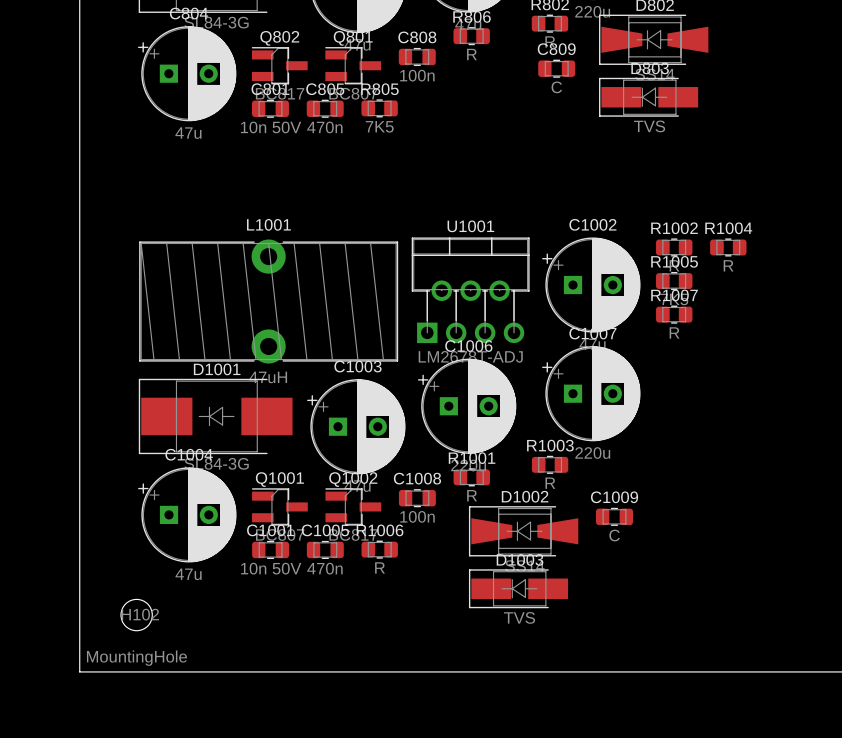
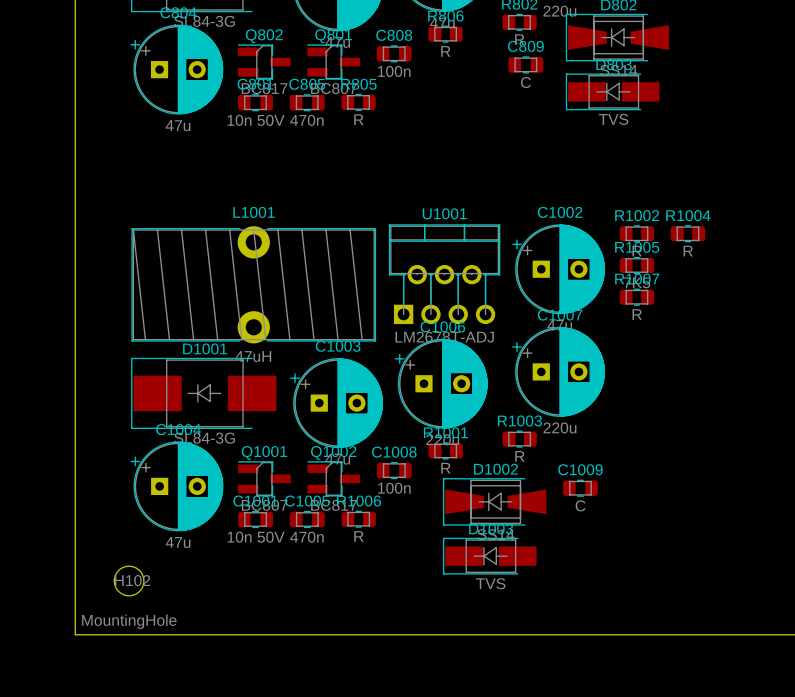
R805 value: 7K5 (379, 126) -> R (358, 119)

